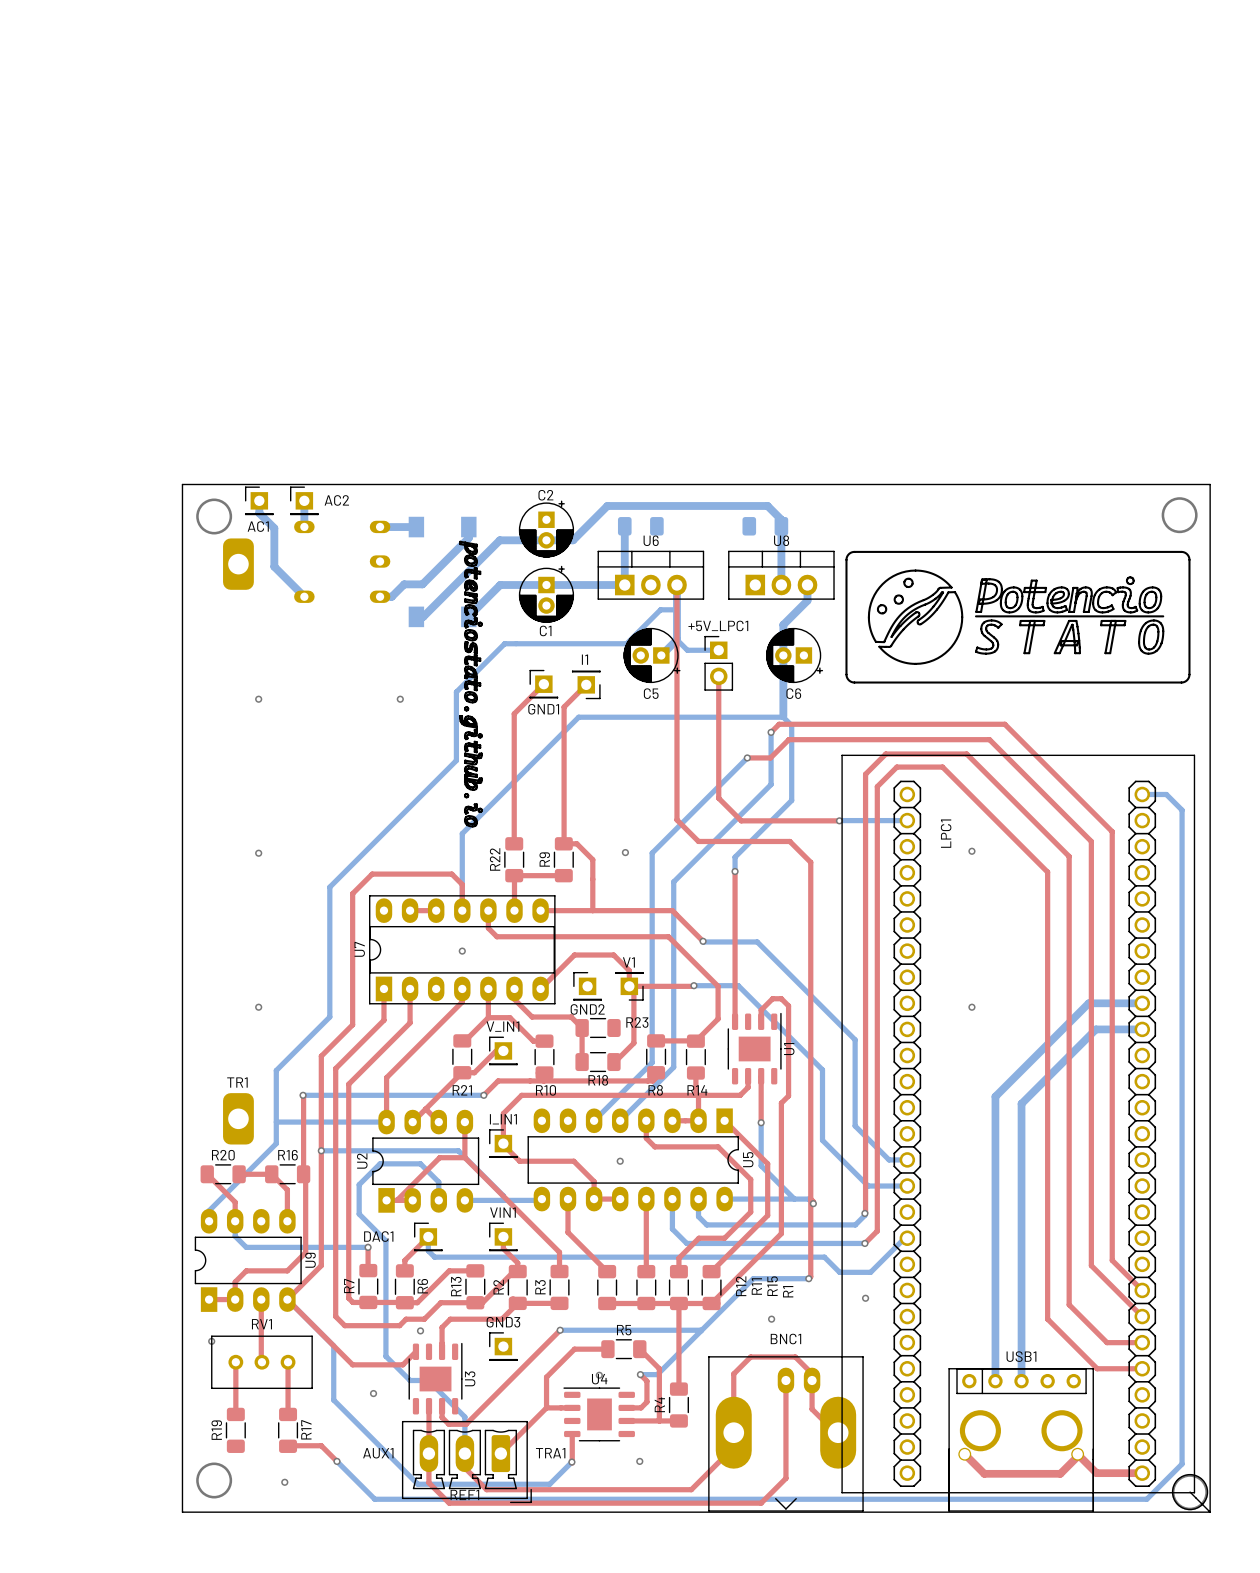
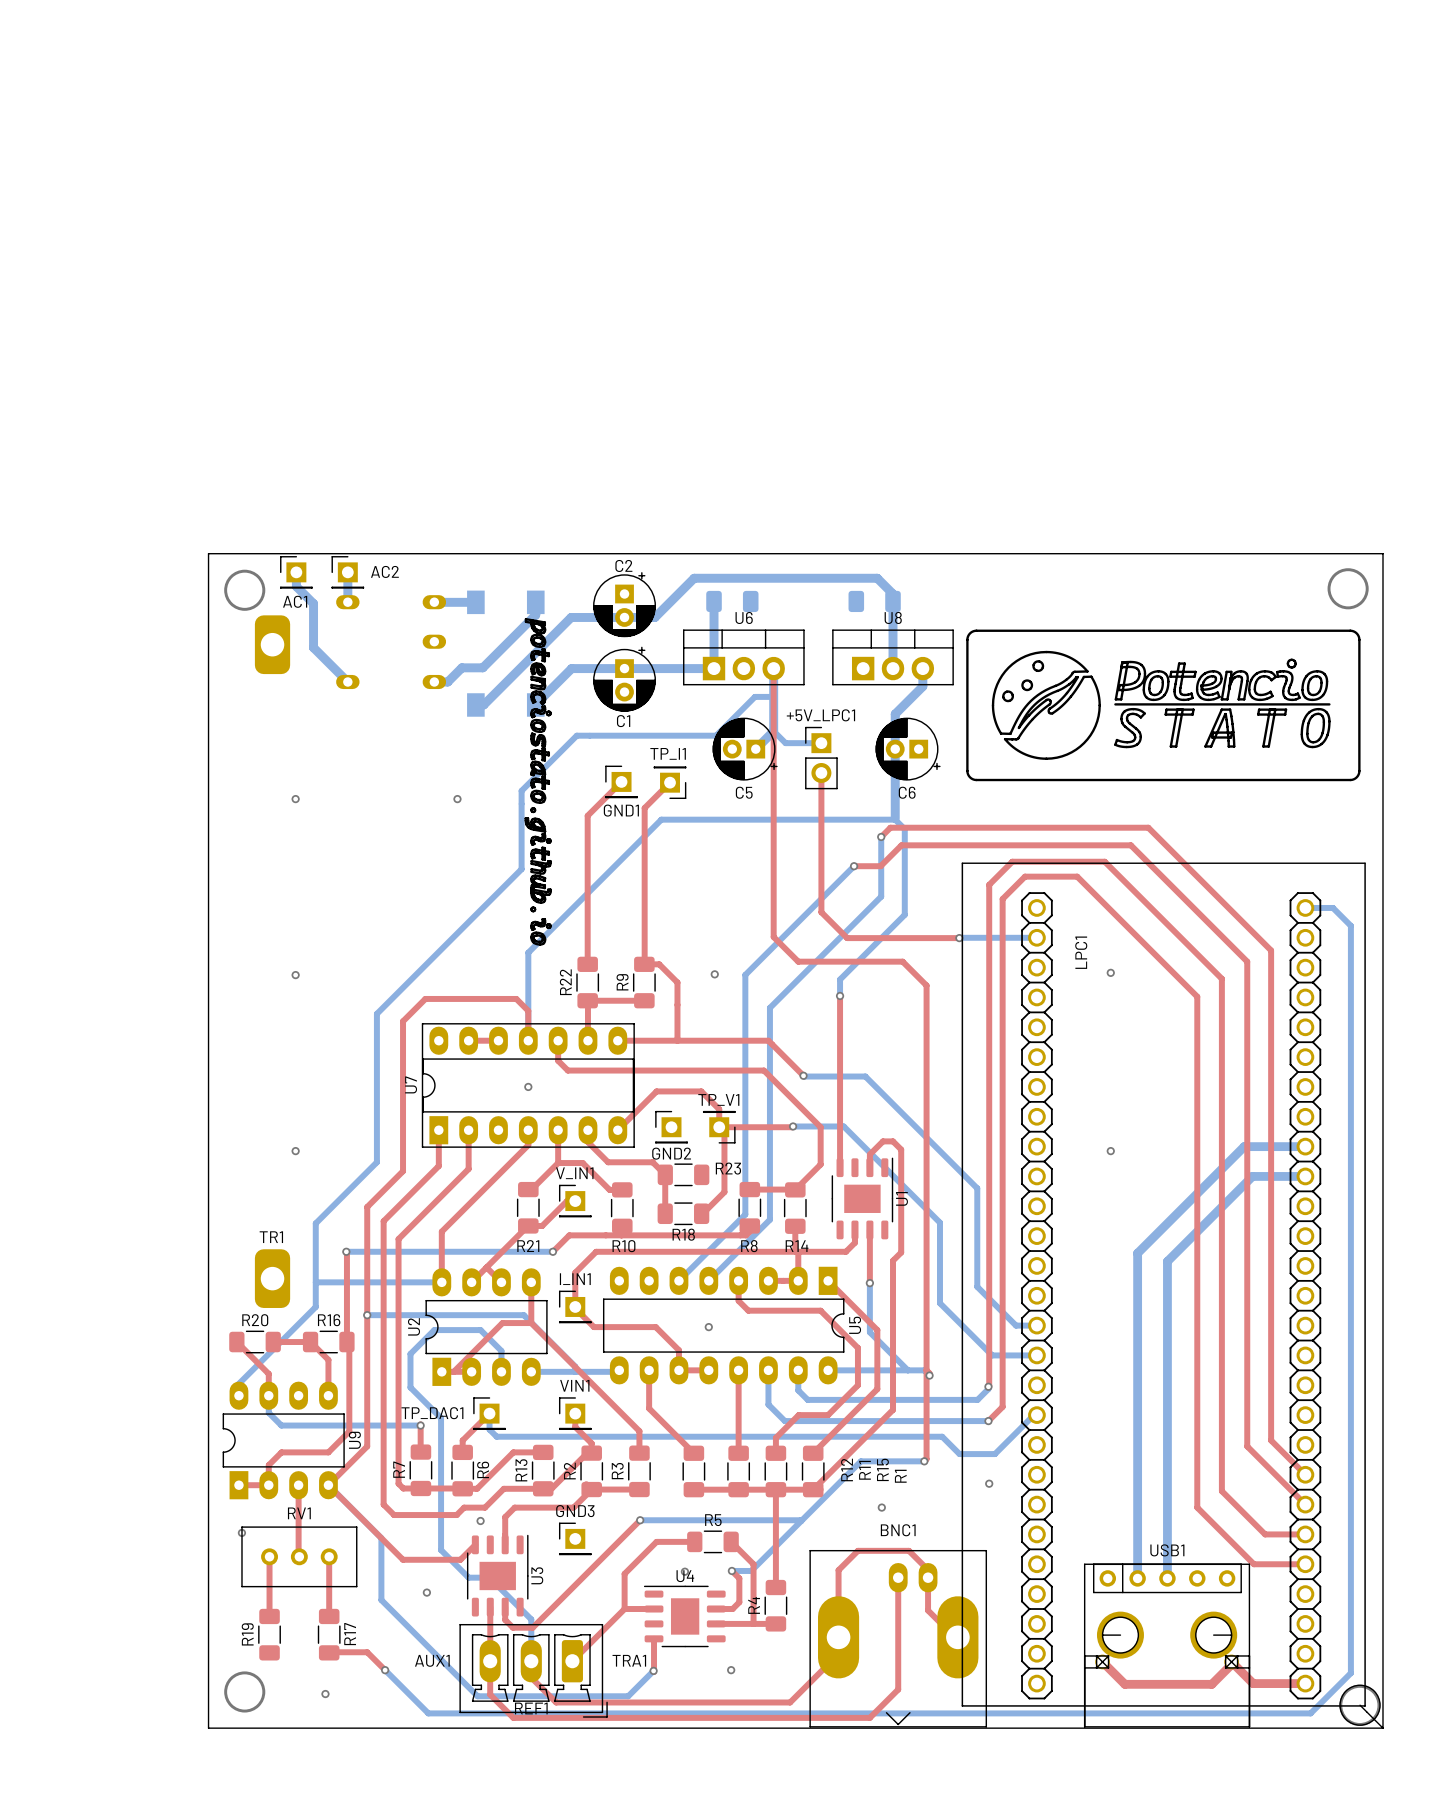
I1 name: I1 (584, 659) -> TP_I1 (668, 753)
V1 name: V1 (628, 962) -> TP_V1 (718, 1099)
DAC1 name: DAC1 (378, 1236) -> TP_DAC1 (432, 1413)
USB1 footprint: [948, 1368, 1094, 1512] -> [1083, 1563, 1251, 1728]

